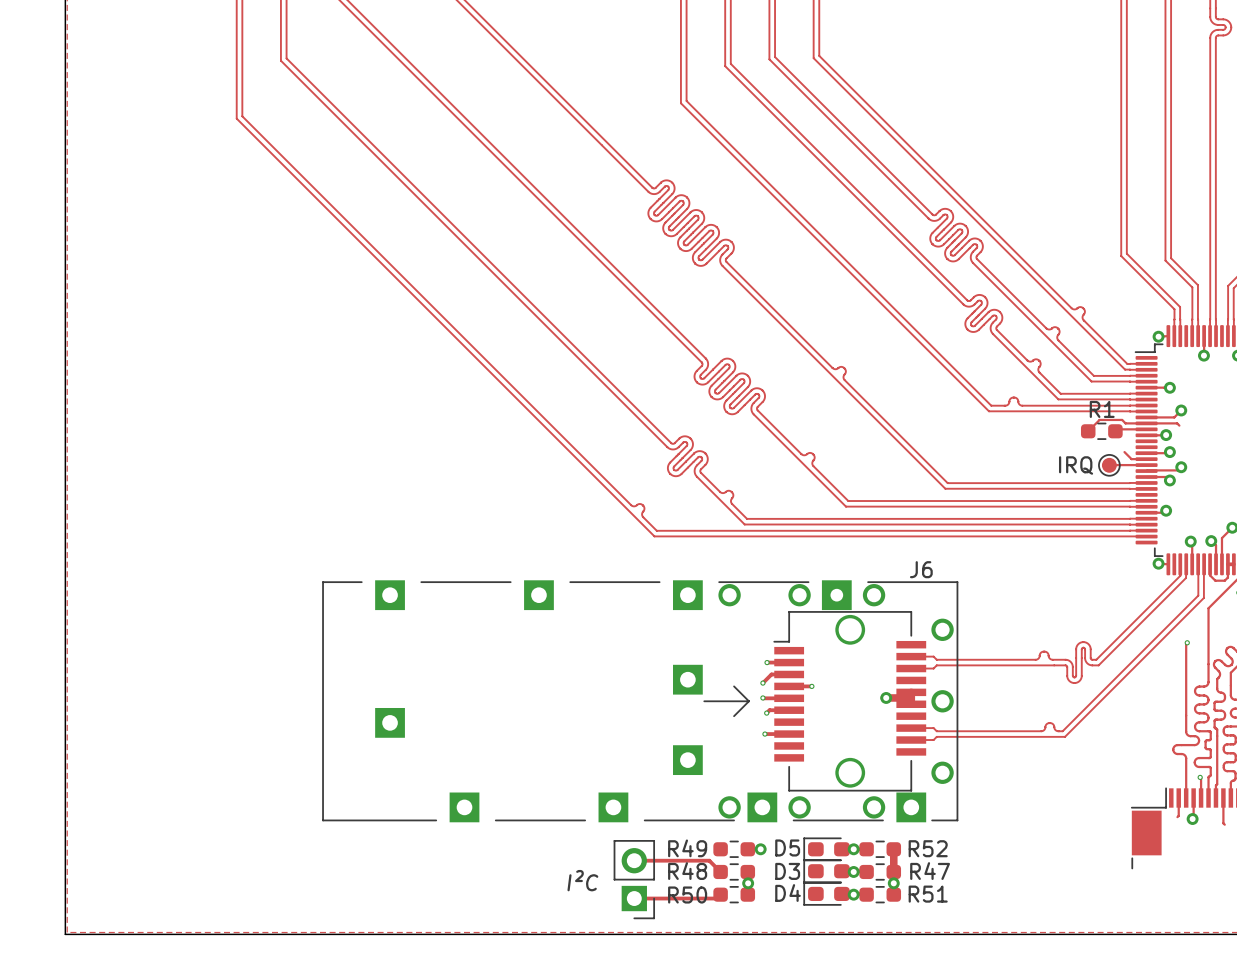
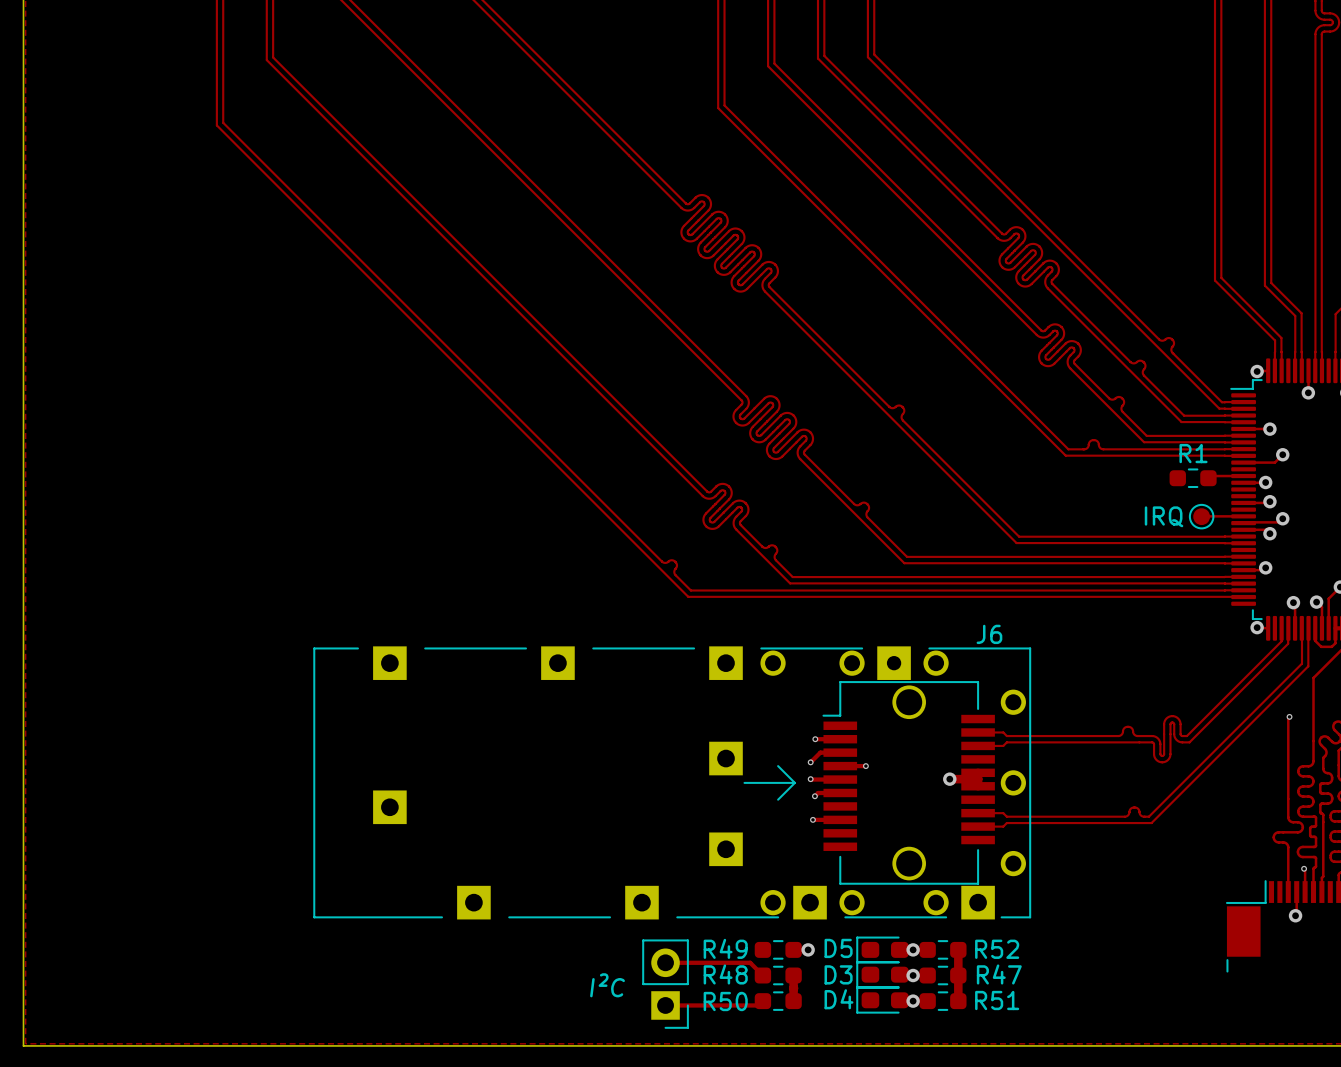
track: (1179, 425) (1177, 423) (1125, 423) (1122, 419) (1099, 419) (1088, 431) -> none
track: (1124, 452) (1131, 459) (1146, 459) -> none
track: (1178, 798) (1177, 817) -> none
track: (1223, 798) (1224, 824) -> none
via: (748, 883) -> none
via: (893, 883) -> none

